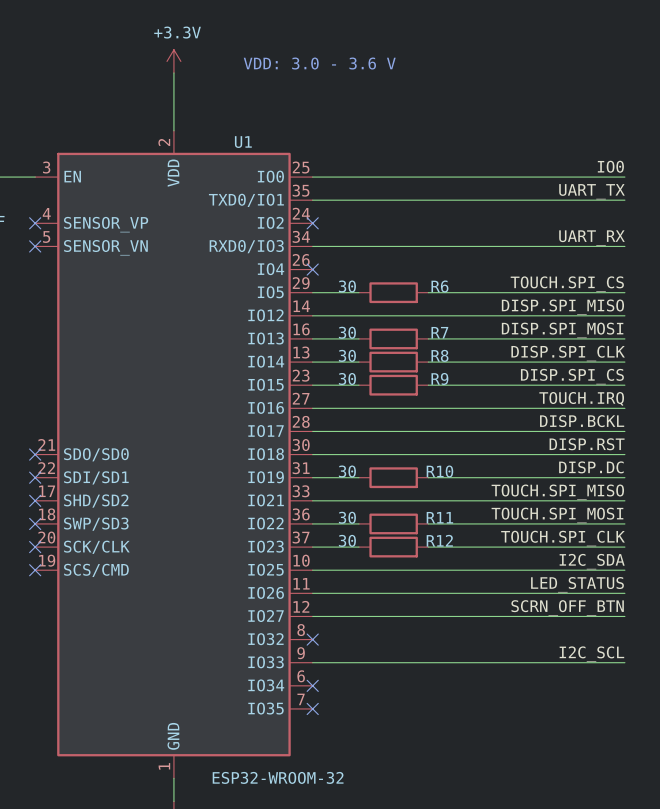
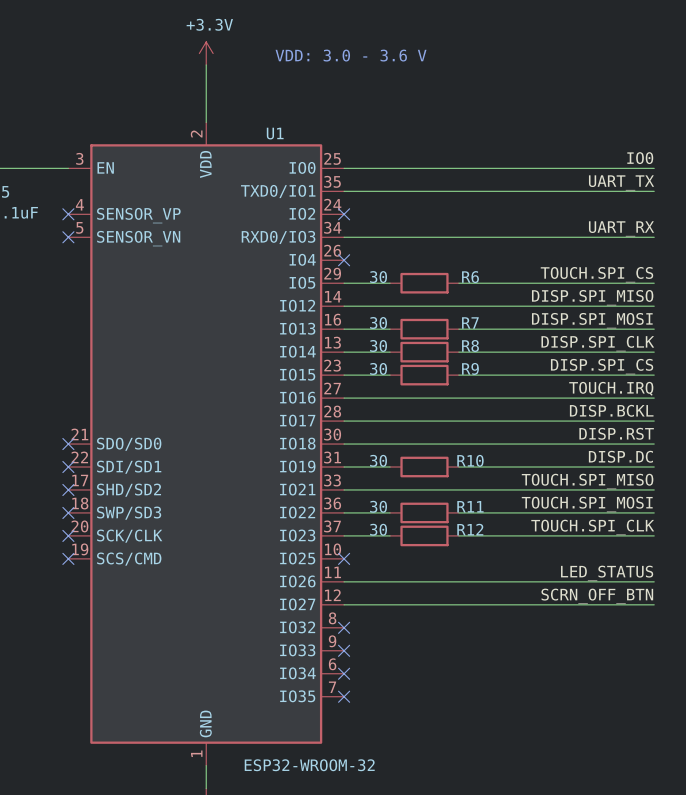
label: I2C_SDA (592, 561) -> none
wire: (312, 570) (624, 570) -> none
no-connect mark: none -> (344, 558)
label: I2C_SCL (591, 654) -> none
wire: (312, 662) (624, 662) -> none
no-connect mark: none -> (344, 650)

